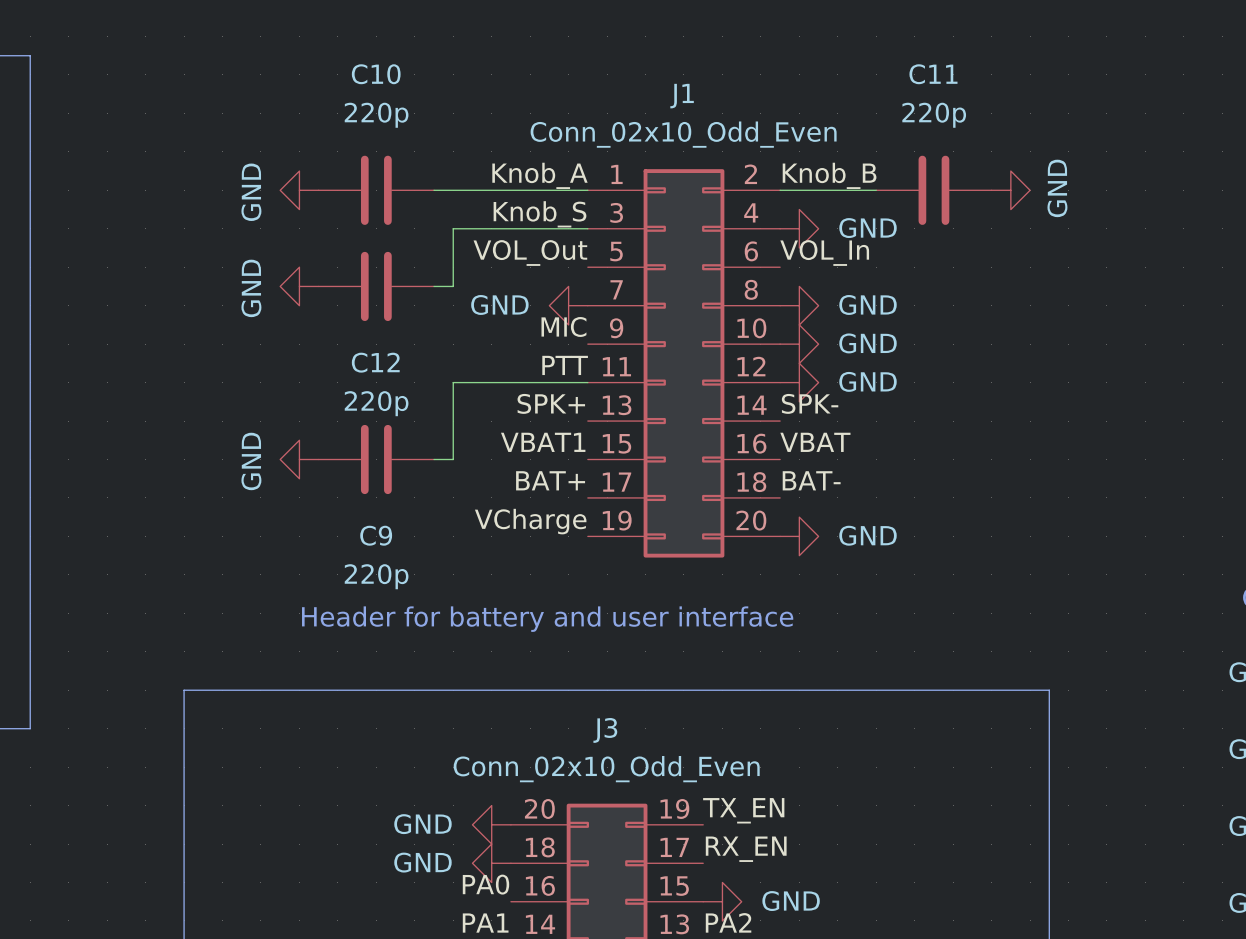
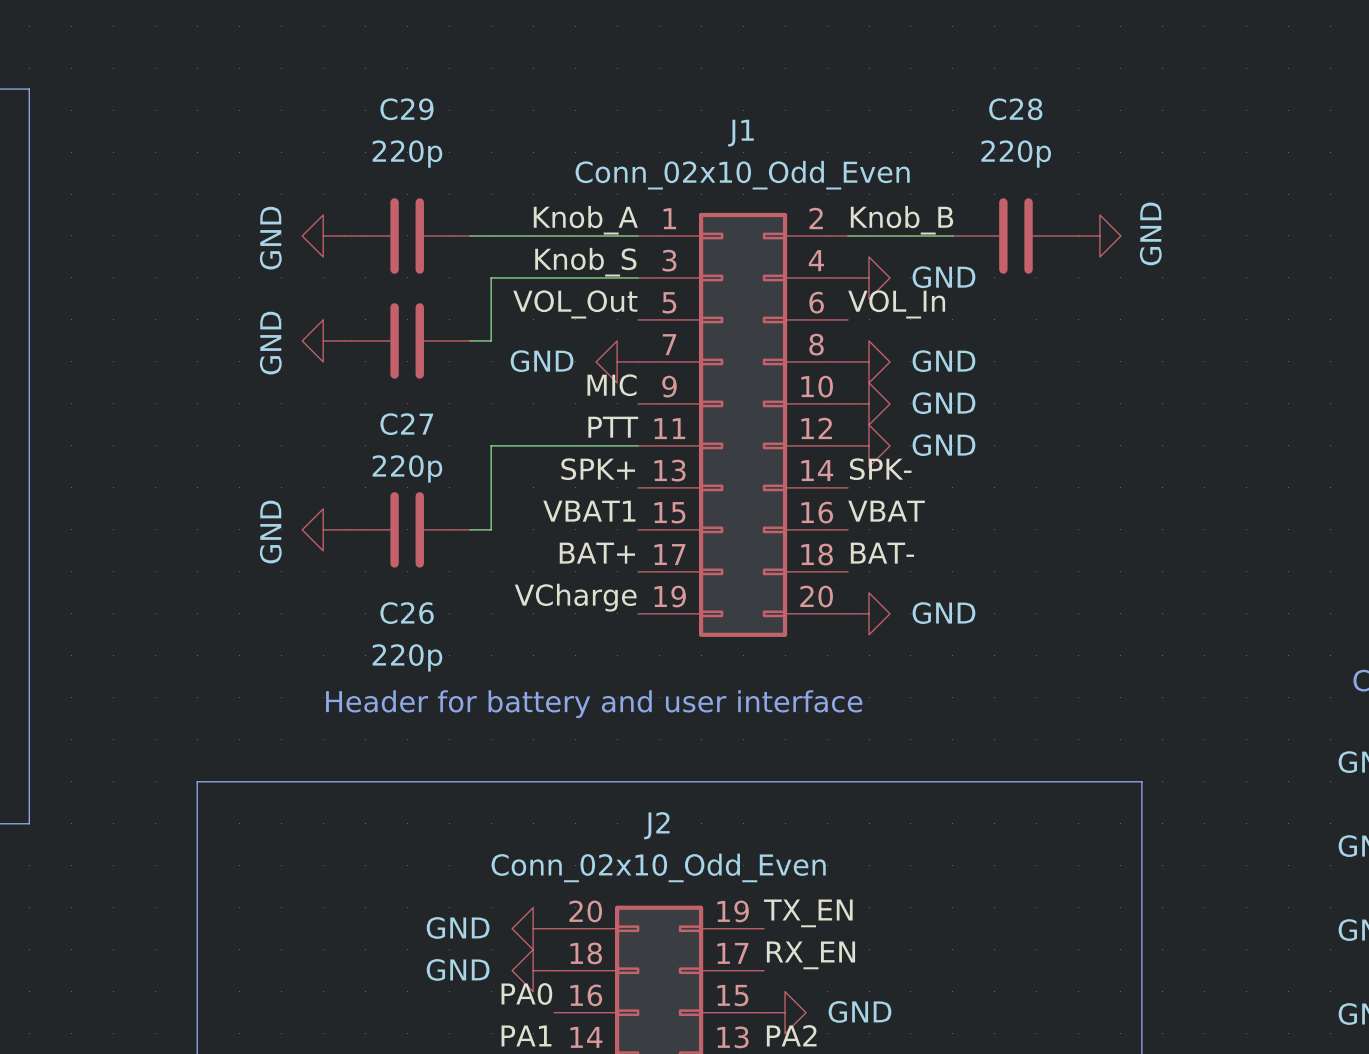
C10 name: C10 (376, 74) -> C29 (406, 109)
C11 name: C11 (933, 74) -> C28 (1015, 109)
C12 name: C12 (375, 362) -> C27 (406, 424)
C9 name: C9 (376, 535) -> C26 (407, 613)
J3 name: J3 (605, 730) -> J2 (656, 825)

